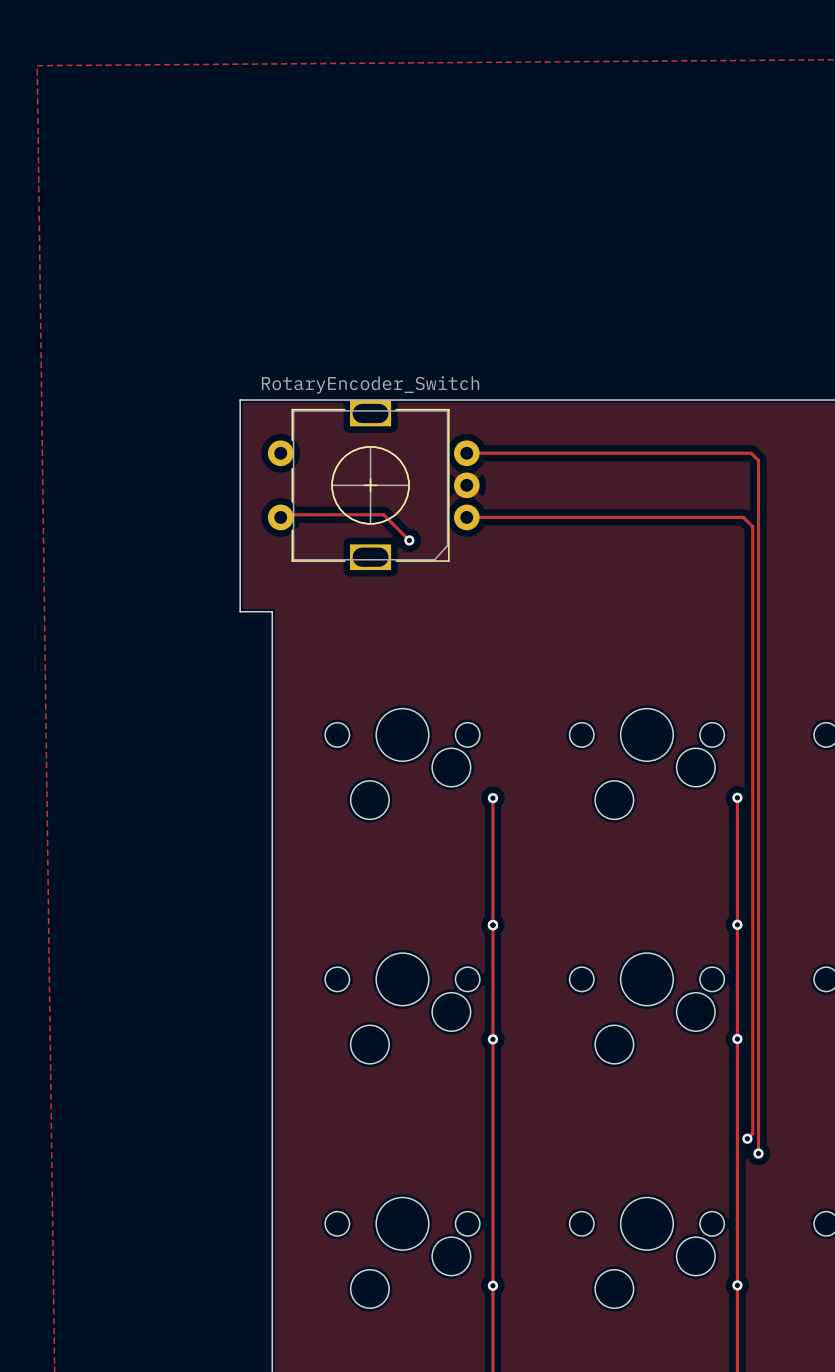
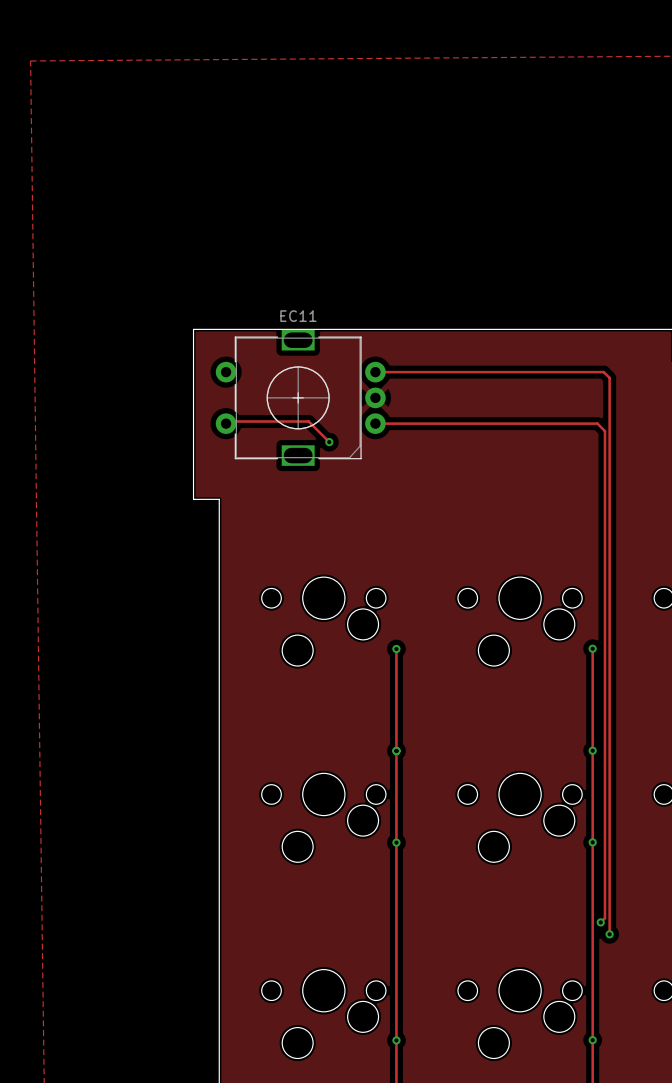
part value: RotaryEncoder_Switch (370, 384) -> EC11 (298, 316)

